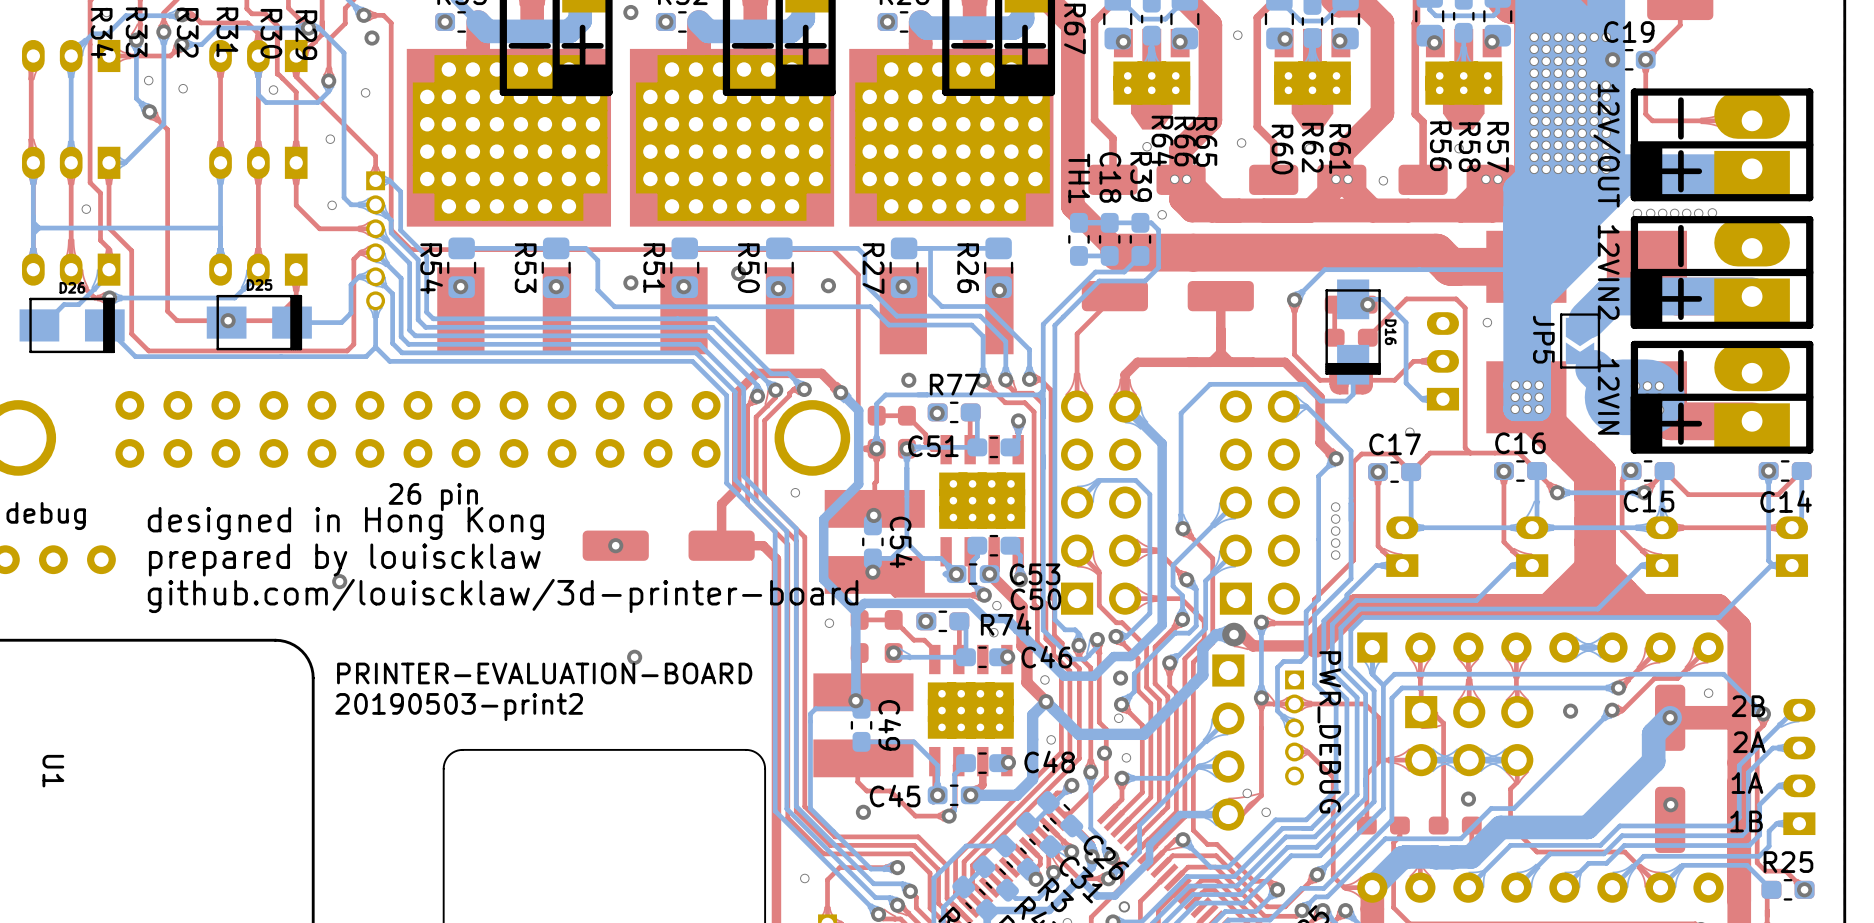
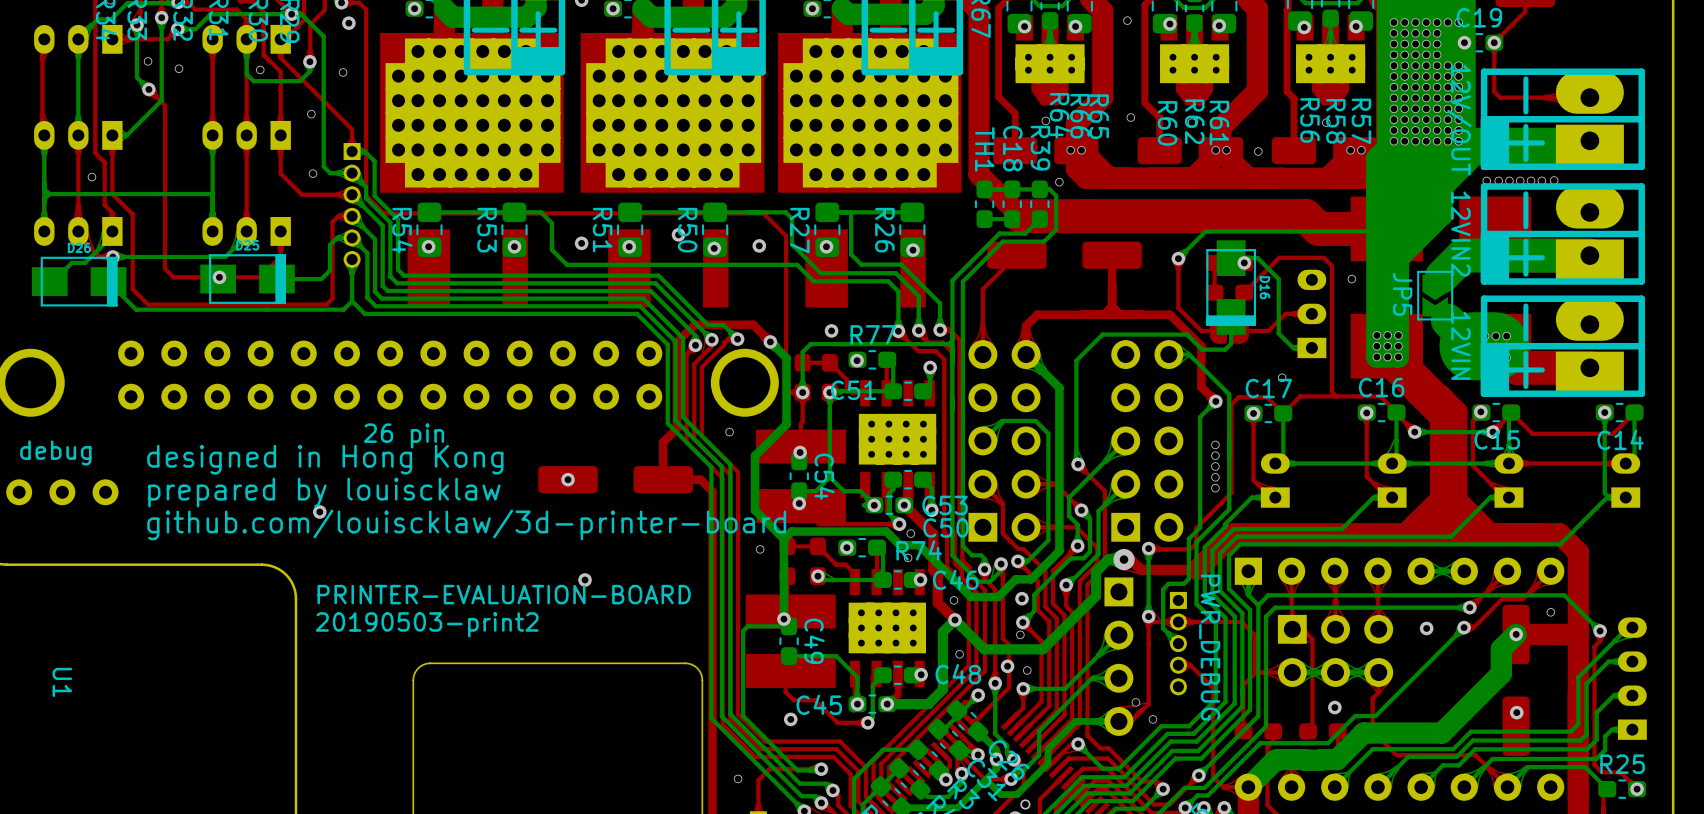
part text: 2B (1748, 706) -> none
part text: 2A (1749, 742) -> none
part text: 1A (1747, 783) -> none
part text: 1B (1746, 821) -> none

